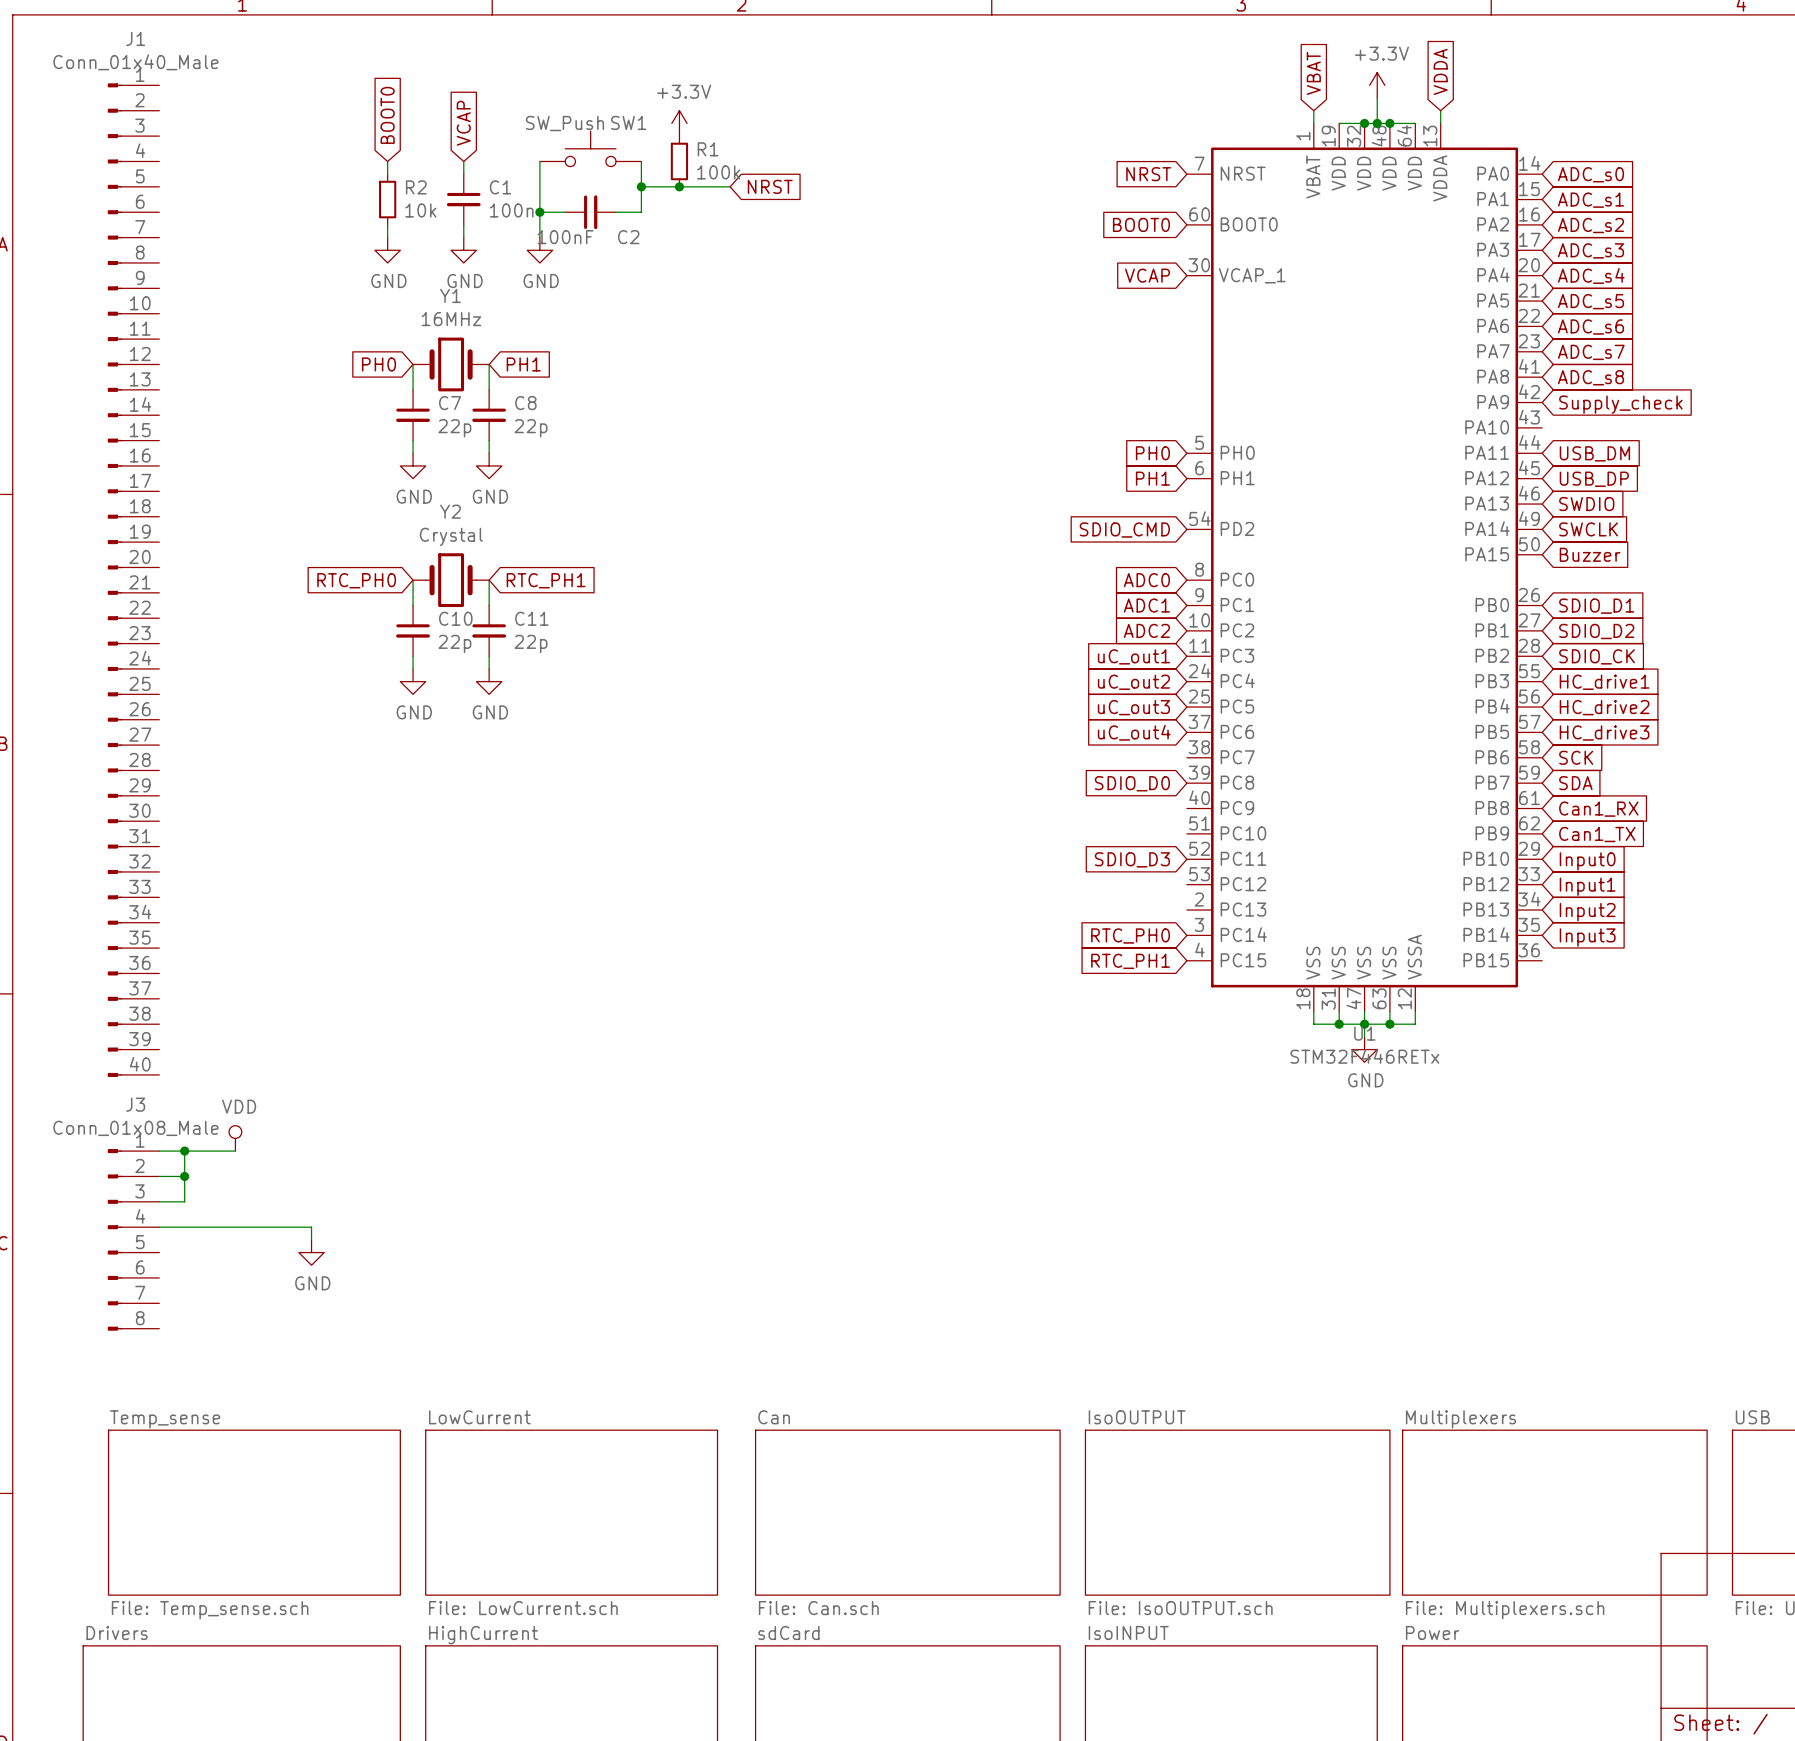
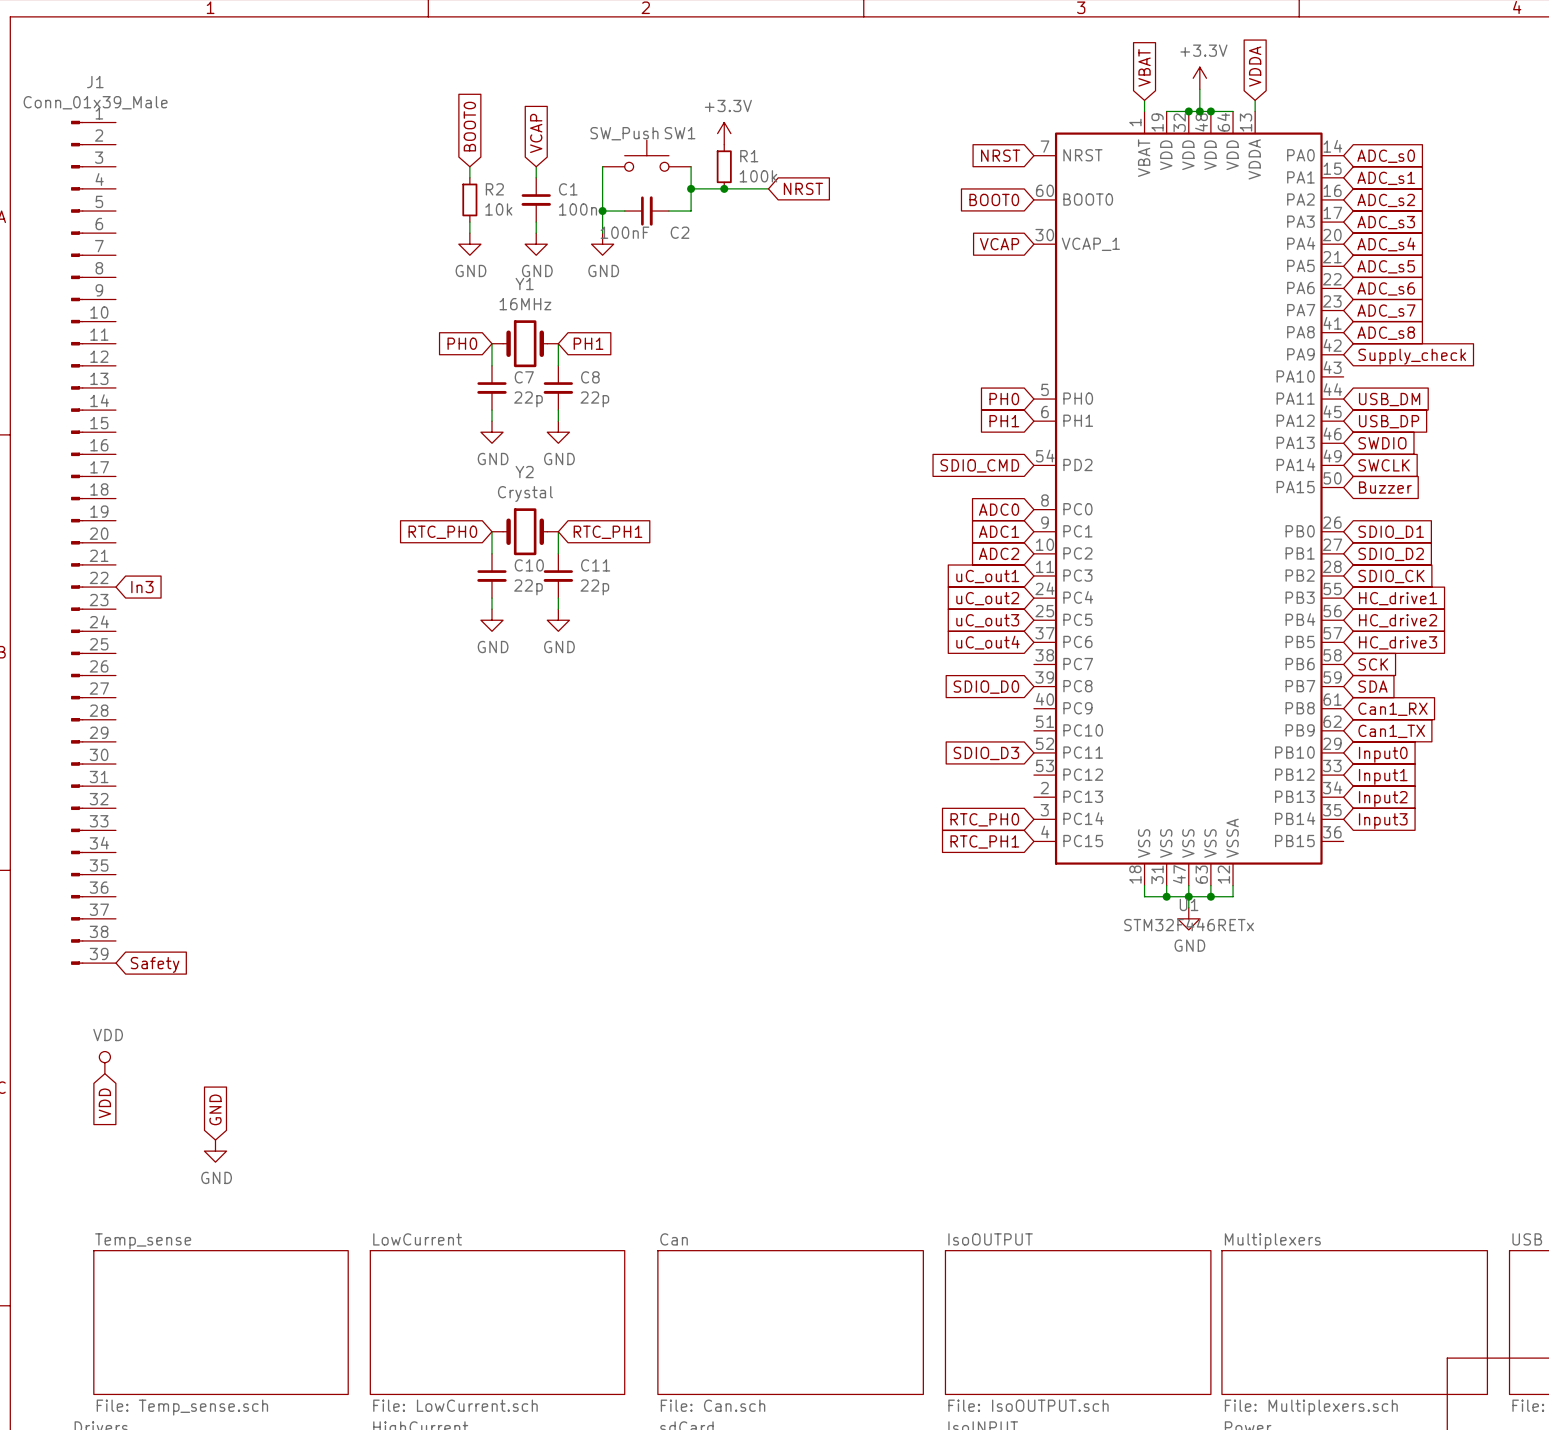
J1 value: Conn_01x40_Male (135, 62) -> Conn_01x39_Male (95, 102)
J1 symbol: [107, 83, 160, 1077] -> [71, 120, 116, 965]
global label position: BOOT0 (387, 115) -> BOOT0 (469, 126)
global label position: VCAP (463, 123) -> VCAP (536, 133)
power symbol position: +3.3V (679, 123) -> +3.3V (724, 133)
SW1 position: (590, 148) -> (646, 155)
wire: (387, 161) (387, 174) -> none
wire: (463, 161) (463, 174) -> (536, 166) (536, 177)
wire: (539, 161) (539, 186) -> none
wire: (641, 161) (641, 212) (616, 212) -> (691, 166) (691, 211) (668, 211)
R1 position: (679, 161) -> (724, 166)
wire: (641, 186) (730, 186) -> (691, 188) (768, 188)
junction: (641, 186) -> none
junction: (679, 186) -> none
wire: none -> (602, 166) (602, 233)
global label position: NRST (770, 186) -> NRST (803, 188)
R2 position: (387, 199) -> (469, 199)
C1 position: (463, 199) -> (536, 199)
wire: (539, 199) (539, 237) -> none
wire: (539, 212) (565, 212) -> (602, 211) (624, 211)
junction: (539, 212) -> none
C2 position: (590, 212) -> (646, 211)
junction: none -> (691, 188)
junction: none -> (724, 188)
wire: (387, 224) (387, 237) -> (469, 222) (469, 233)
wire: (463, 224) (463, 237) -> (536, 222) (536, 233)
junction: none -> (602, 211)
power symbol: GND (387, 250) -> none
power symbol: GND (463, 250) -> none
power symbol position: GND (539, 250) -> GND (469, 244)
power symbol: none -> GND (536, 244)
power symbol: none -> GND (602, 244)
global label position: PH0 (379, 364) -> PH0 (462, 343)
wire: (413, 364) (413, 389) -> (491, 343) (491, 365)
Y1 position: (451, 364) -> (525, 343)
wire: (489, 364) (489, 389) -> (558, 343) (558, 365)
global label position: PH1 (523, 364) -> PH1 (588, 343)
C7 position: (413, 415) -> (491, 387)
C8 position: (489, 415) -> (558, 387)
wire: (413, 440) (413, 453) -> (491, 410) (491, 421)
wire: (489, 440) (489, 453) -> (558, 410) (558, 421)
power symbol: GND (413, 465) -> none
power symbol: GND (489, 465) -> none
power symbol: none -> GND (491, 432)
power symbol: none -> GND (558, 432)
global label position: RTC_PH0 (356, 580) -> RTC_PH0 (442, 532)
wire: (413, 580) (413, 605) -> (491, 531) (491, 553)
Y2 position: (451, 580) -> (525, 531)
wire: (489, 580) (489, 605) -> (558, 531) (558, 553)
global label position: RTC_PH1 (546, 580) -> RTC_PH1 (608, 532)
C10 position: (413, 630) -> (491, 575)
C11 position: (489, 630) -> (558, 575)
wire: (413, 656) (413, 668) -> (491, 598) (491, 609)
wire: (489, 656) (489, 668) -> (558, 598) (558, 609)
global label: none -> In3 (142, 587)
power symbol: GND (413, 681) -> none
power symbol: GND (489, 681) -> none
power symbol: none -> GND (491, 620)
power symbol: none -> GND (558, 620)
global label: none -> Safety (155, 964)
power symbol position: VDD (235, 1138) -> VDD (104, 1062)
wire: (159, 1151) (235, 1151) -> none
wire: (184, 1151) (184, 1201) (159, 1201) -> none
junction: (184, 1151) -> none
wire: (159, 1176) (184, 1176) -> none
junction: (184, 1176) -> none
wire: (159, 1227) (311, 1227) (311, 1239) -> none
J3: Conn_01x08_Male (133, 1239) -> none
power symbol position: GND (311, 1252) -> GND (215, 1151)
global label: none -> VDD (104, 1103)
global label: none -> GND (215, 1109)

